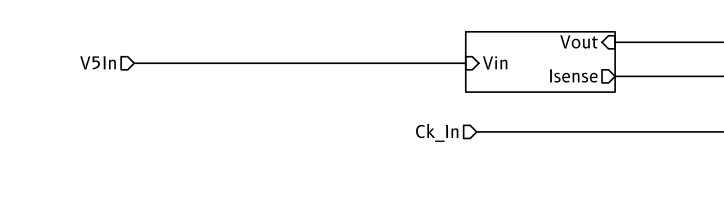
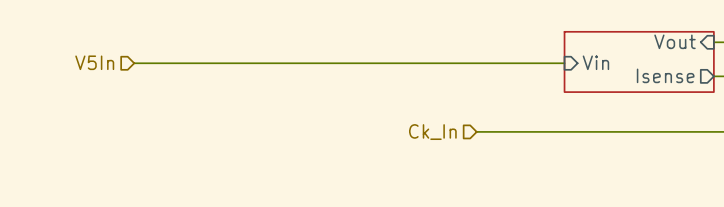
sheet pin position: Vout (579, 41) -> Vout (675, 41)
wire: (615, 42) (713, 42) -> none
sheet: (540, 61) -> none
sheet: none -> (639, 61)
sheet pin position: Vin (495, 62) -> Vin (595, 62)
sheet pin: Isense (573, 75) -> none
sheet pin: none -> Isense (665, 75)
wire: (615, 76) (713, 76) -> (465, 63) (564, 63)

